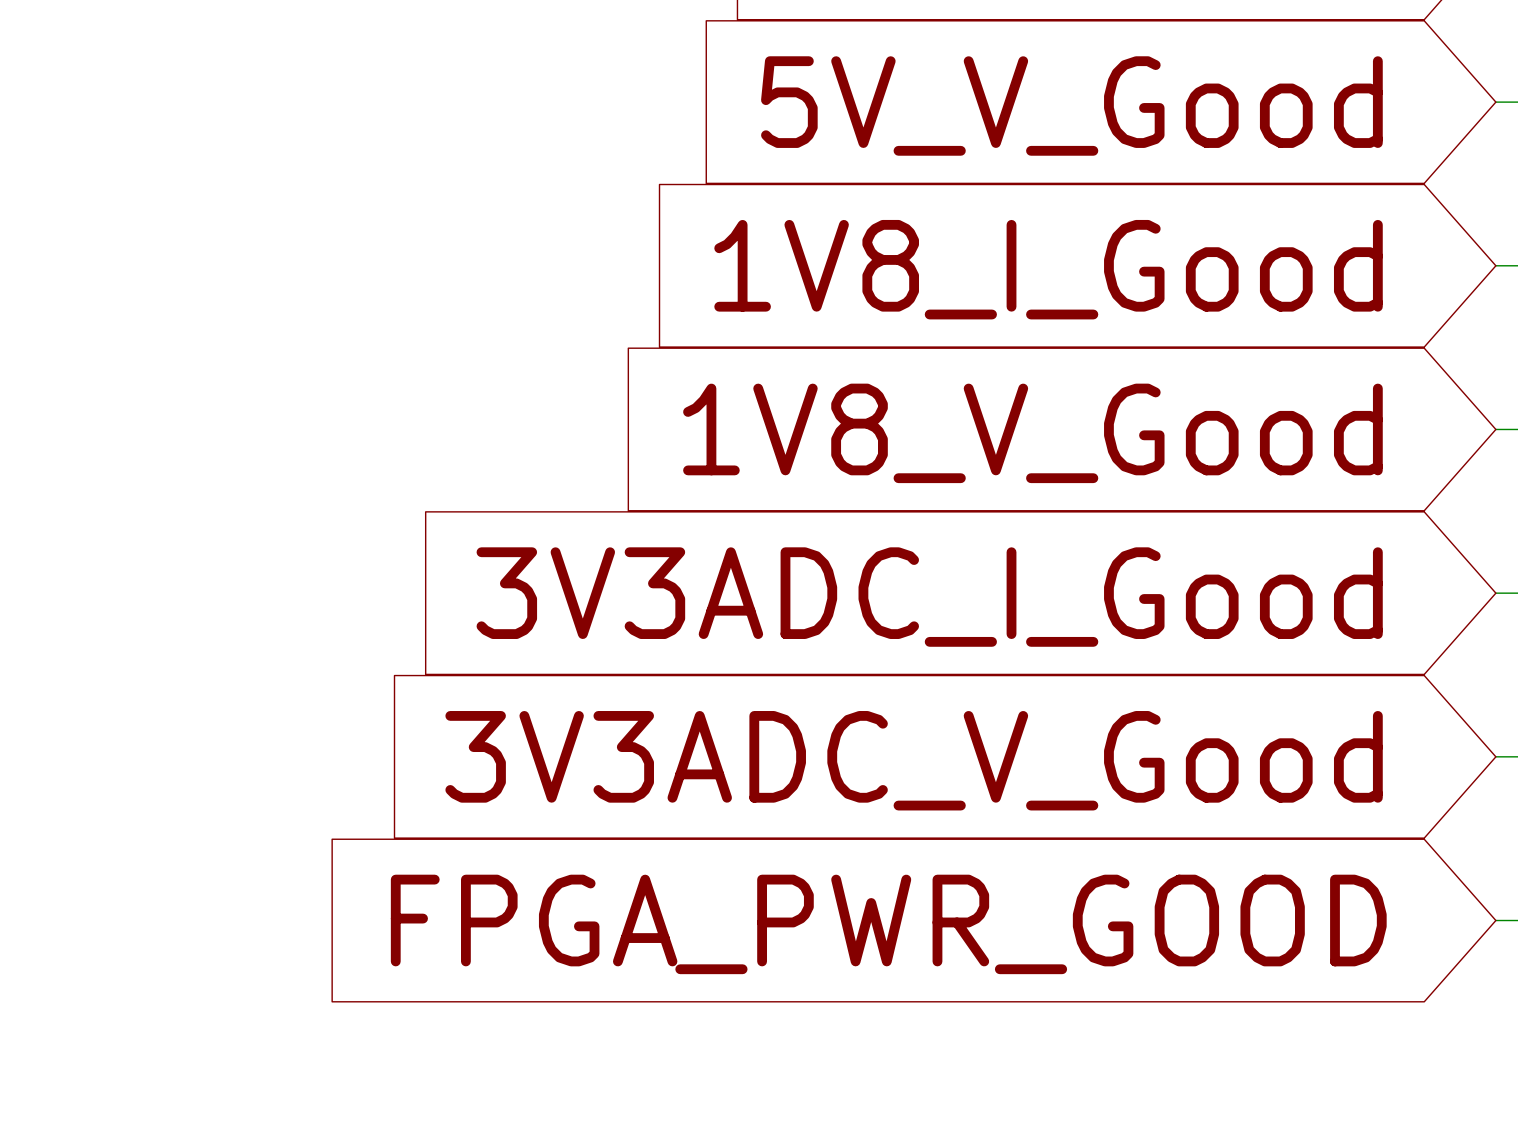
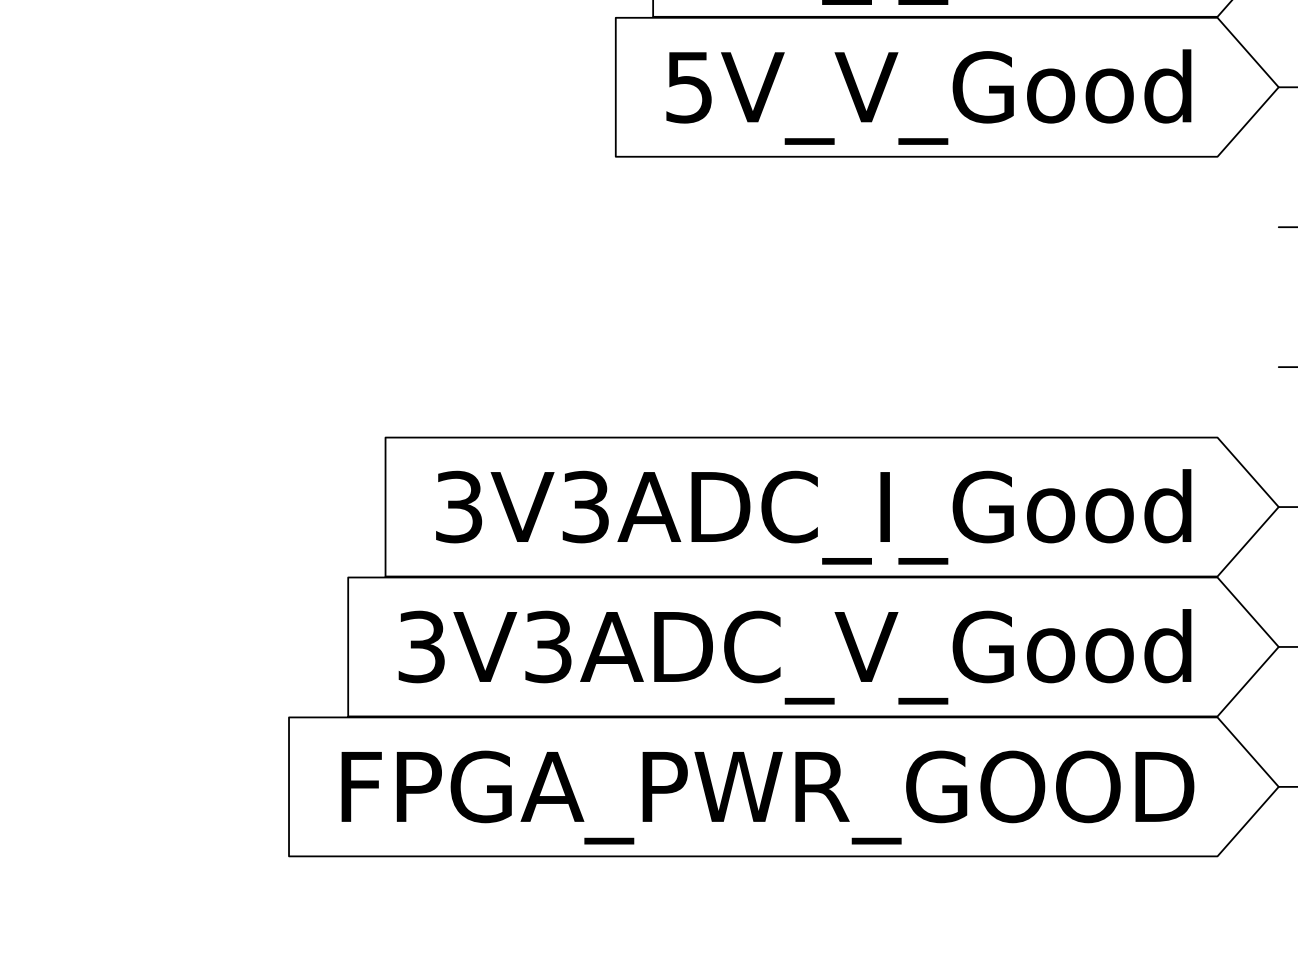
global label: 1V8_I_Good (1048, 269) -> none
global label: 1V8_V_Good (1032, 433) -> none

